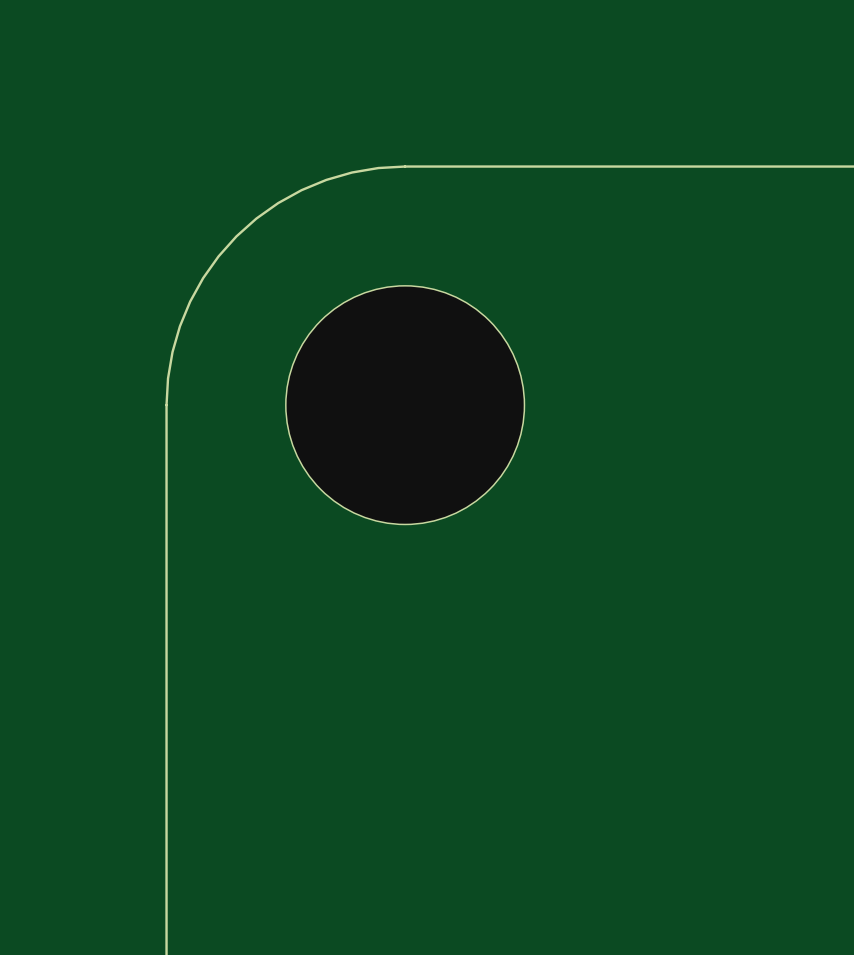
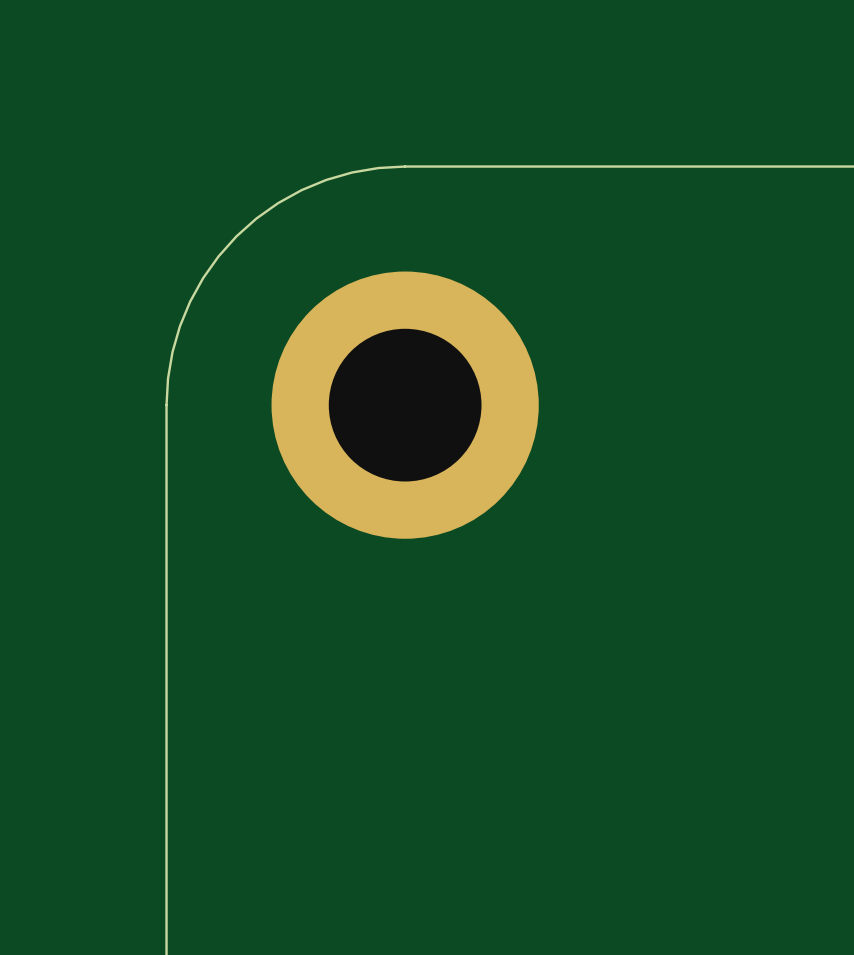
part footprint: [285, 285, 525, 525] -> [271, 271, 539, 539]

